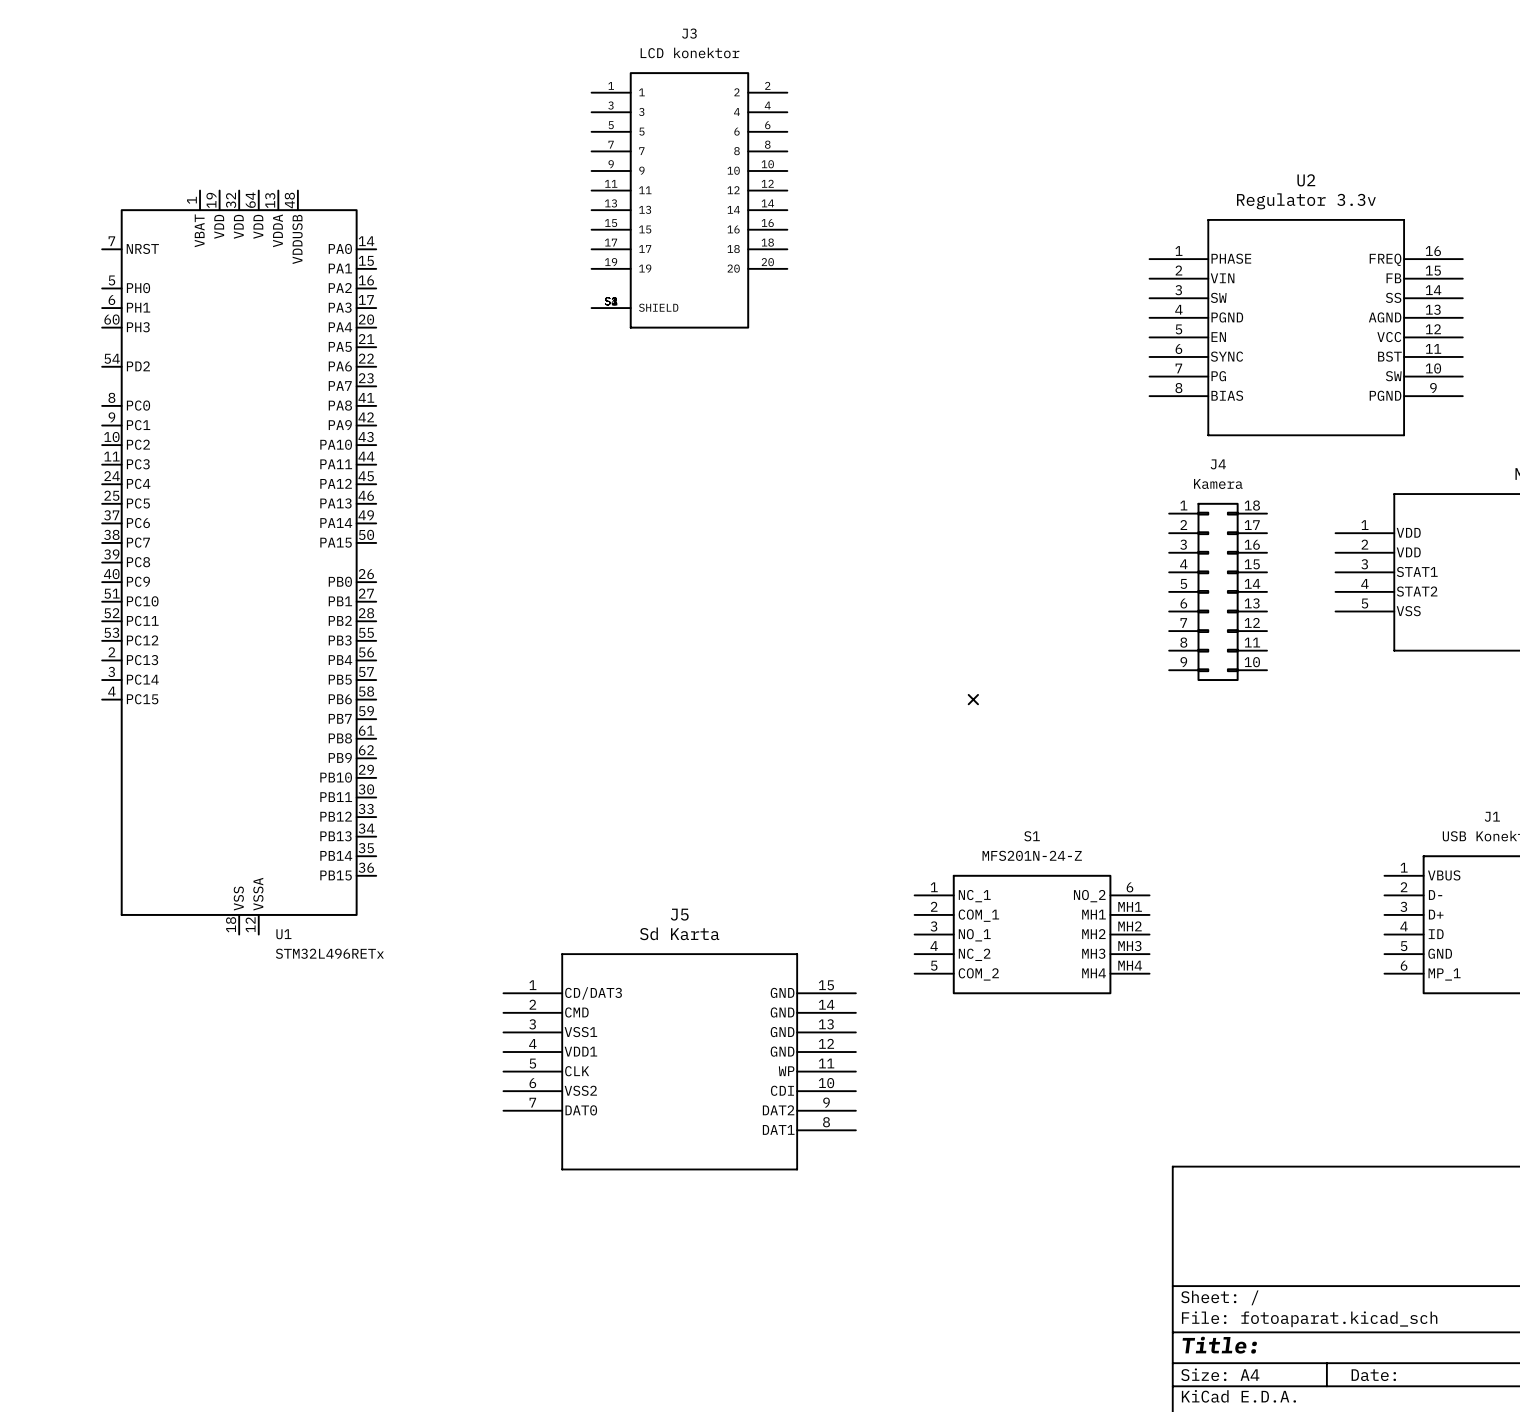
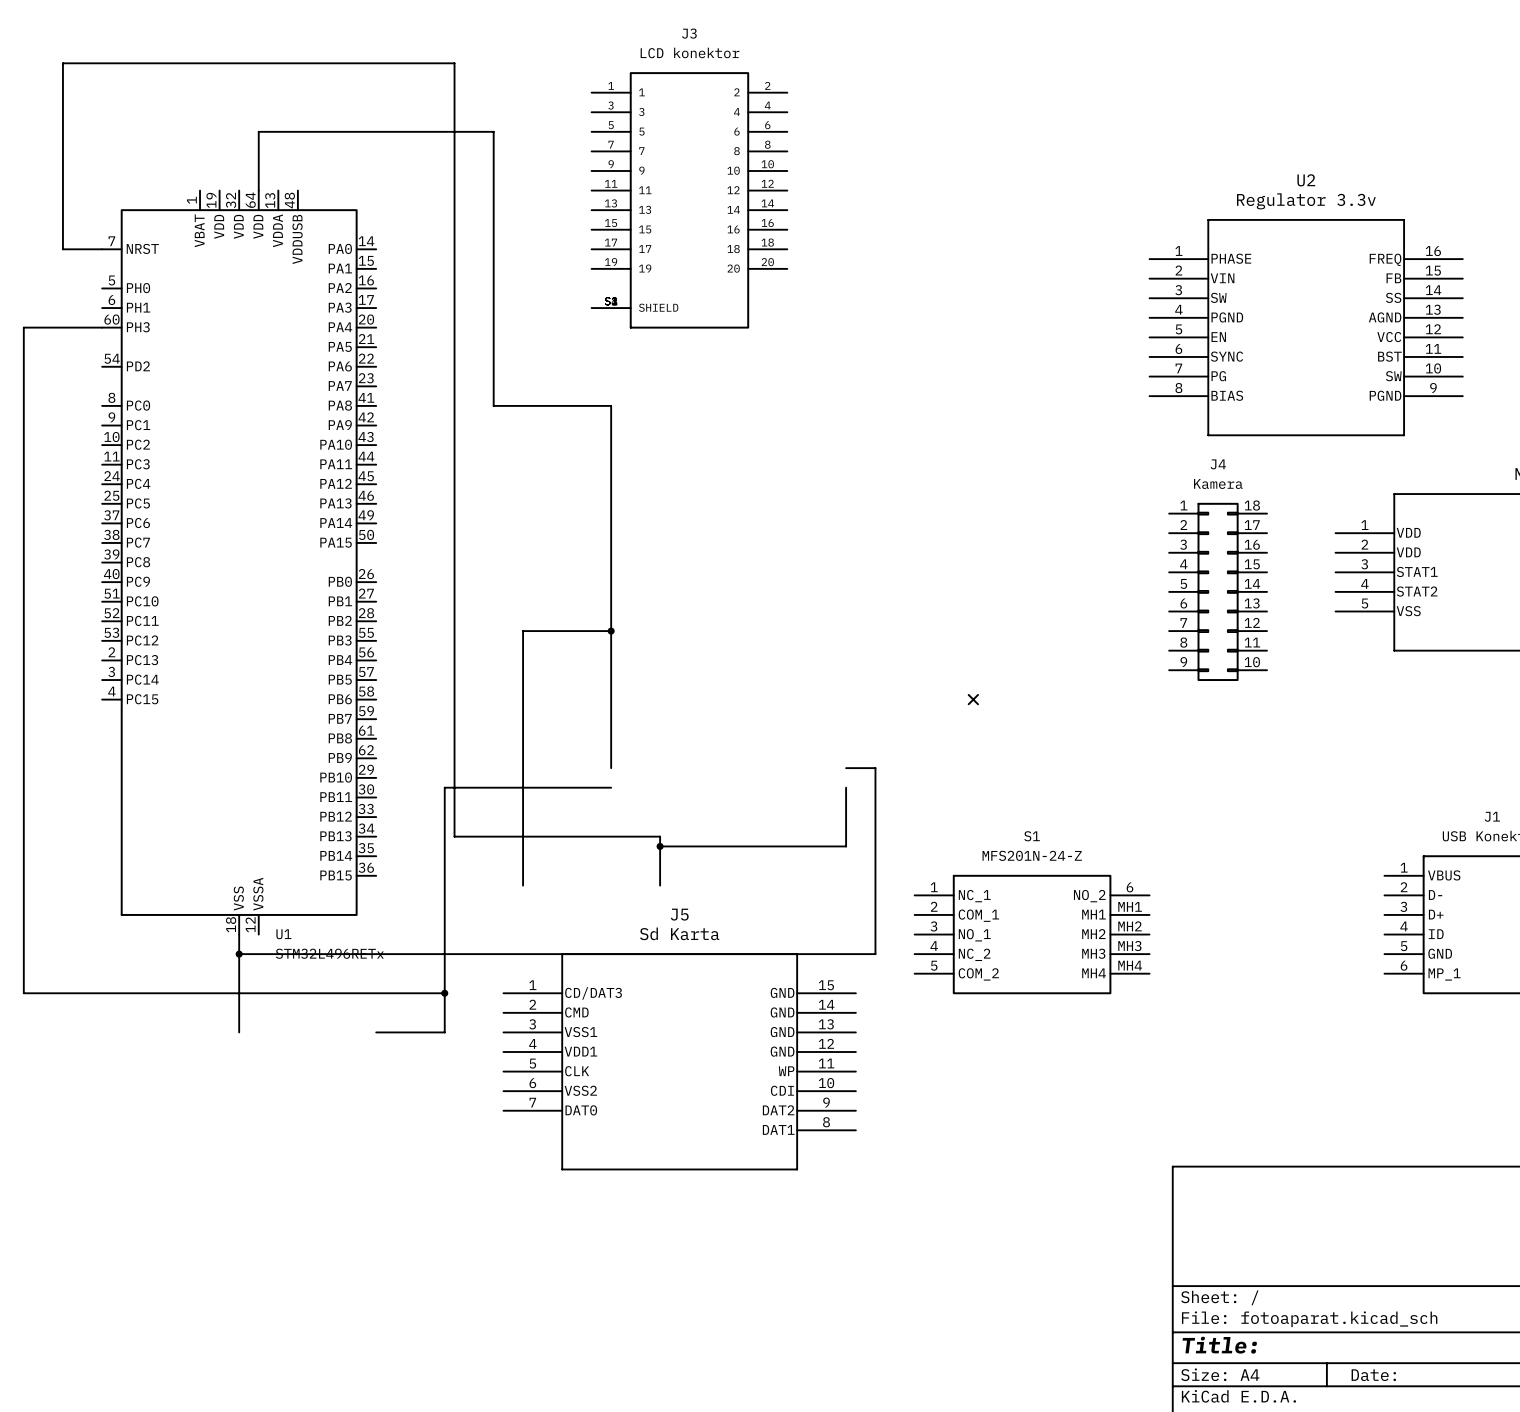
wire: none -> (258, 190) (258, 131) (493, 131) (493, 405) (611, 405) (611, 768)
wire: none -> (102, 249) (62, 249) (62, 63) (454, 63) (454, 836) (660, 836) (660, 885)
wire: none -> (102, 327) (23, 327) (23, 993) (444, 993)
wire: none -> (611, 631) (523, 631) (523, 885)
junction: none -> (611, 631)
wire: none -> (846, 768) (875, 768) (875, 954) (239, 954)
wire: none -> (611, 787) (444, 787) (444, 1032) (376, 1032)
wire: none -> (846, 787) (846, 846) (660, 846)
junction: none -> (660, 846)
wire: none -> (239, 934) (239, 1032)
junction: none -> (239, 954)
junction: none -> (444, 993)

